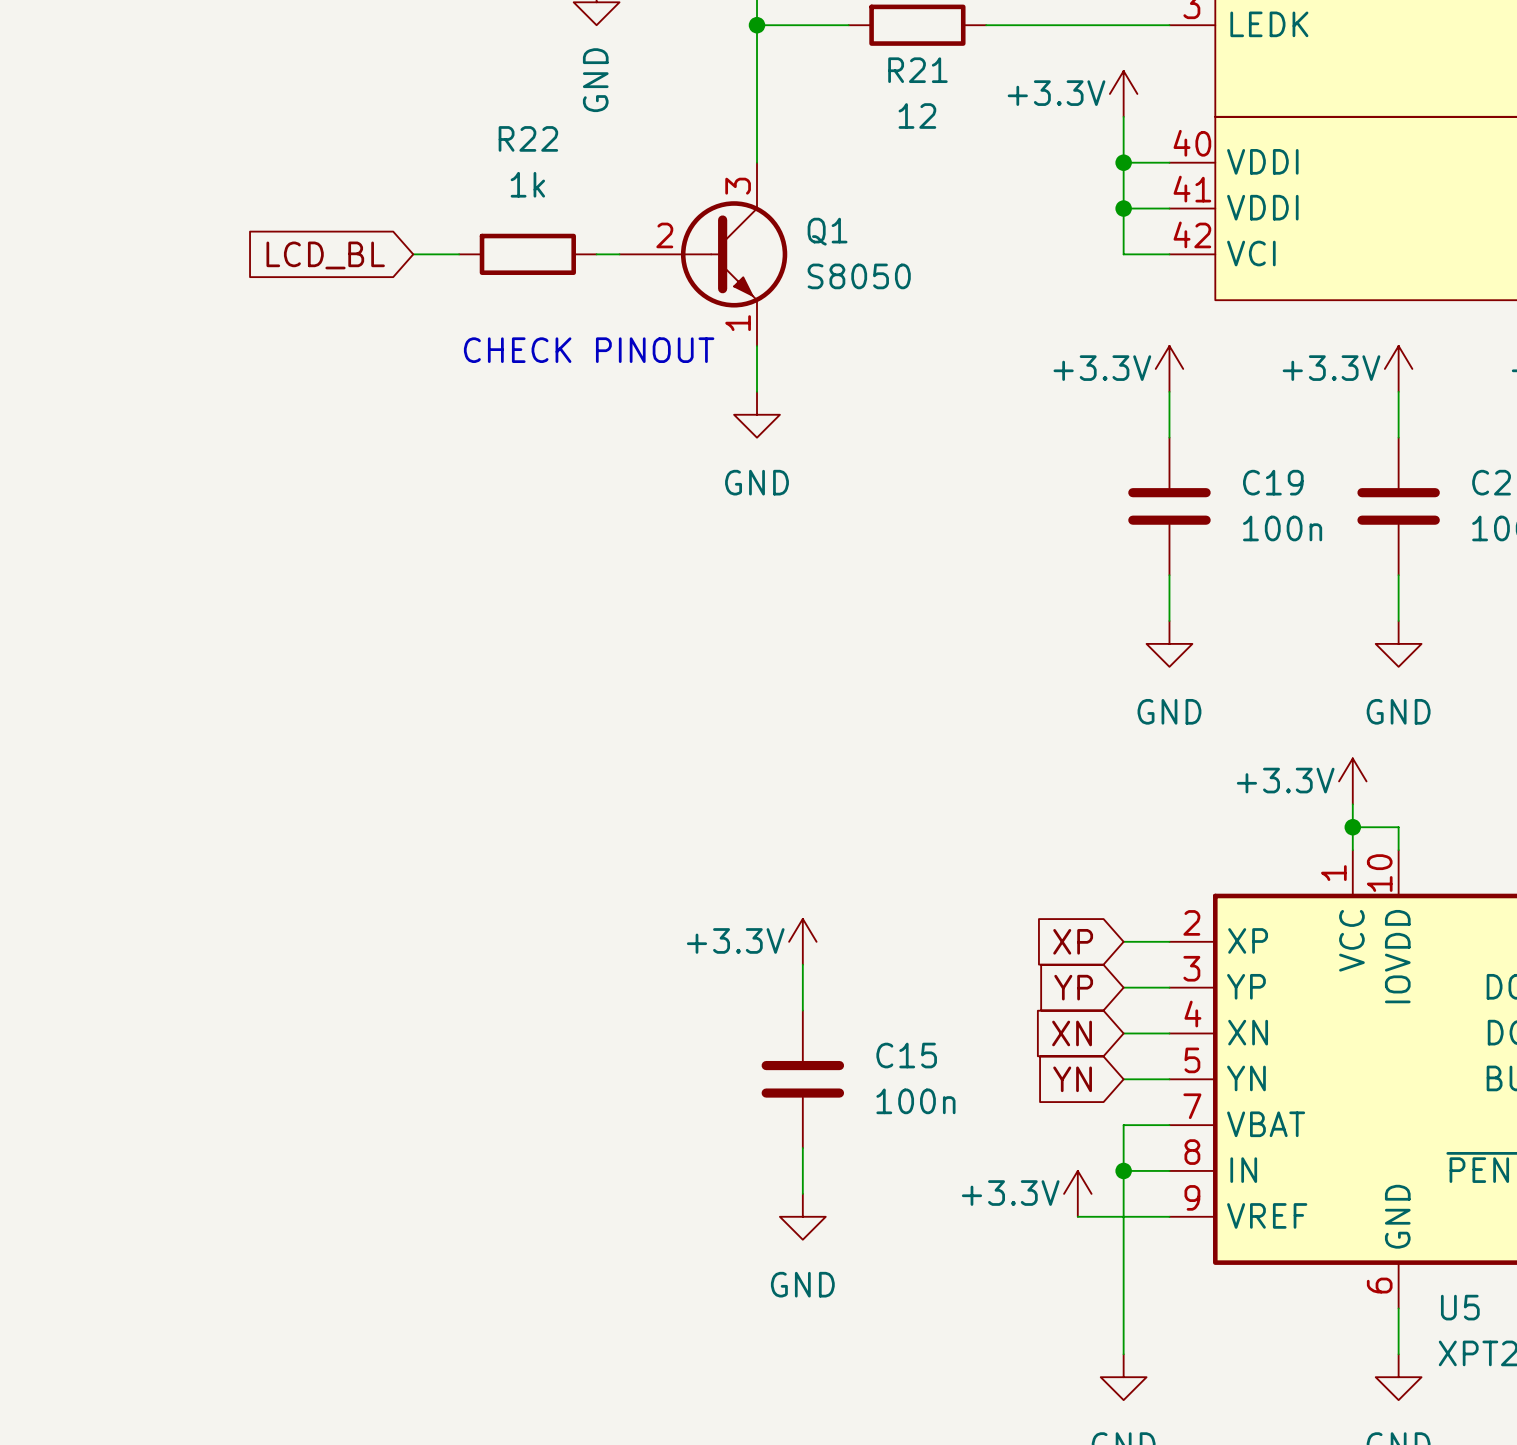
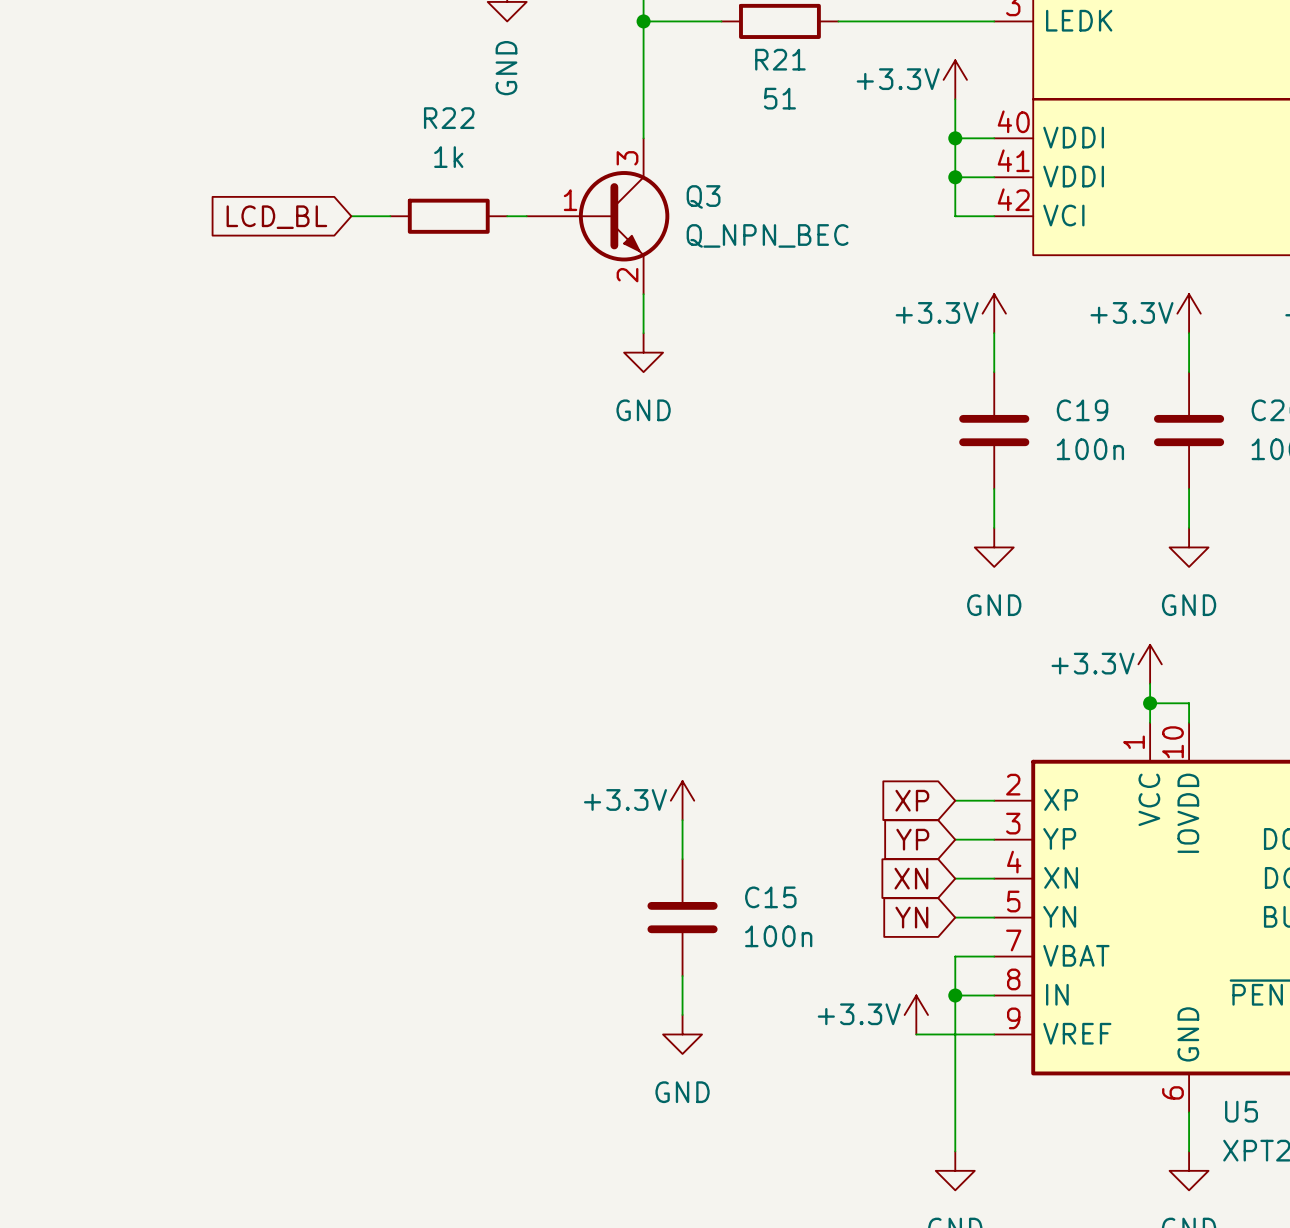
R21 value: 12 (917, 116) -> 51 (779, 98)
Q1: S8050 (703, 254) -> none
Q3: none -> Q_NPN_BEC (597, 216)
text: CHECK PINOUT (589, 350) -> none

